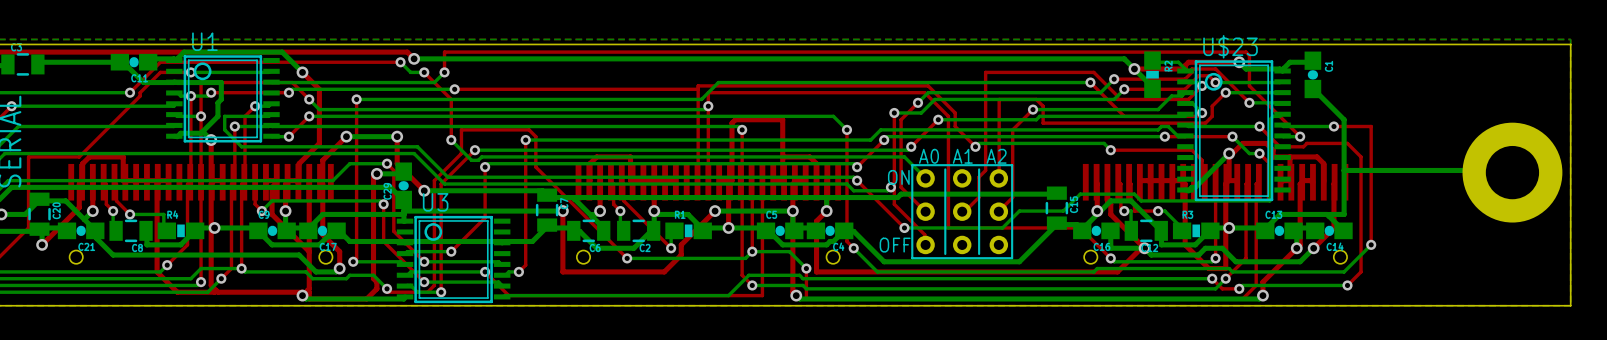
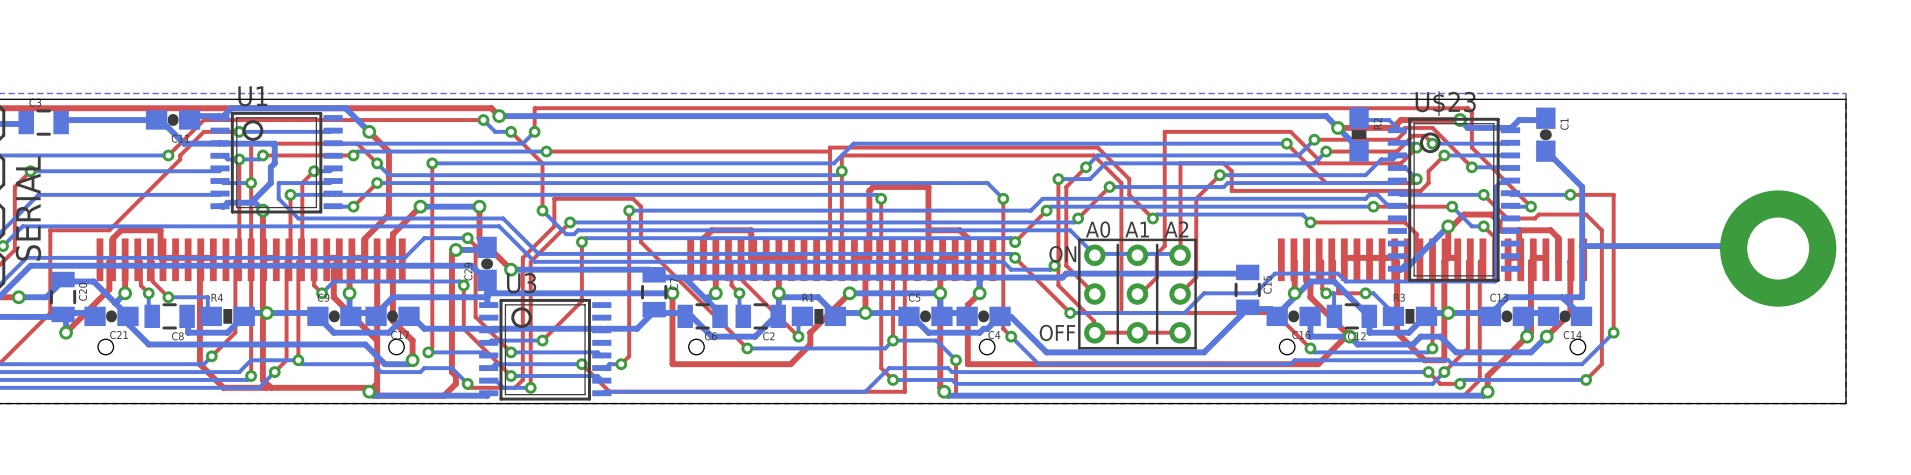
bottom track: none -> (1093, 253) (1180, 255)
top track: none -> (1137, 332) (1093, 332)
top track: none -> (1180, 332) (1137, 332)

